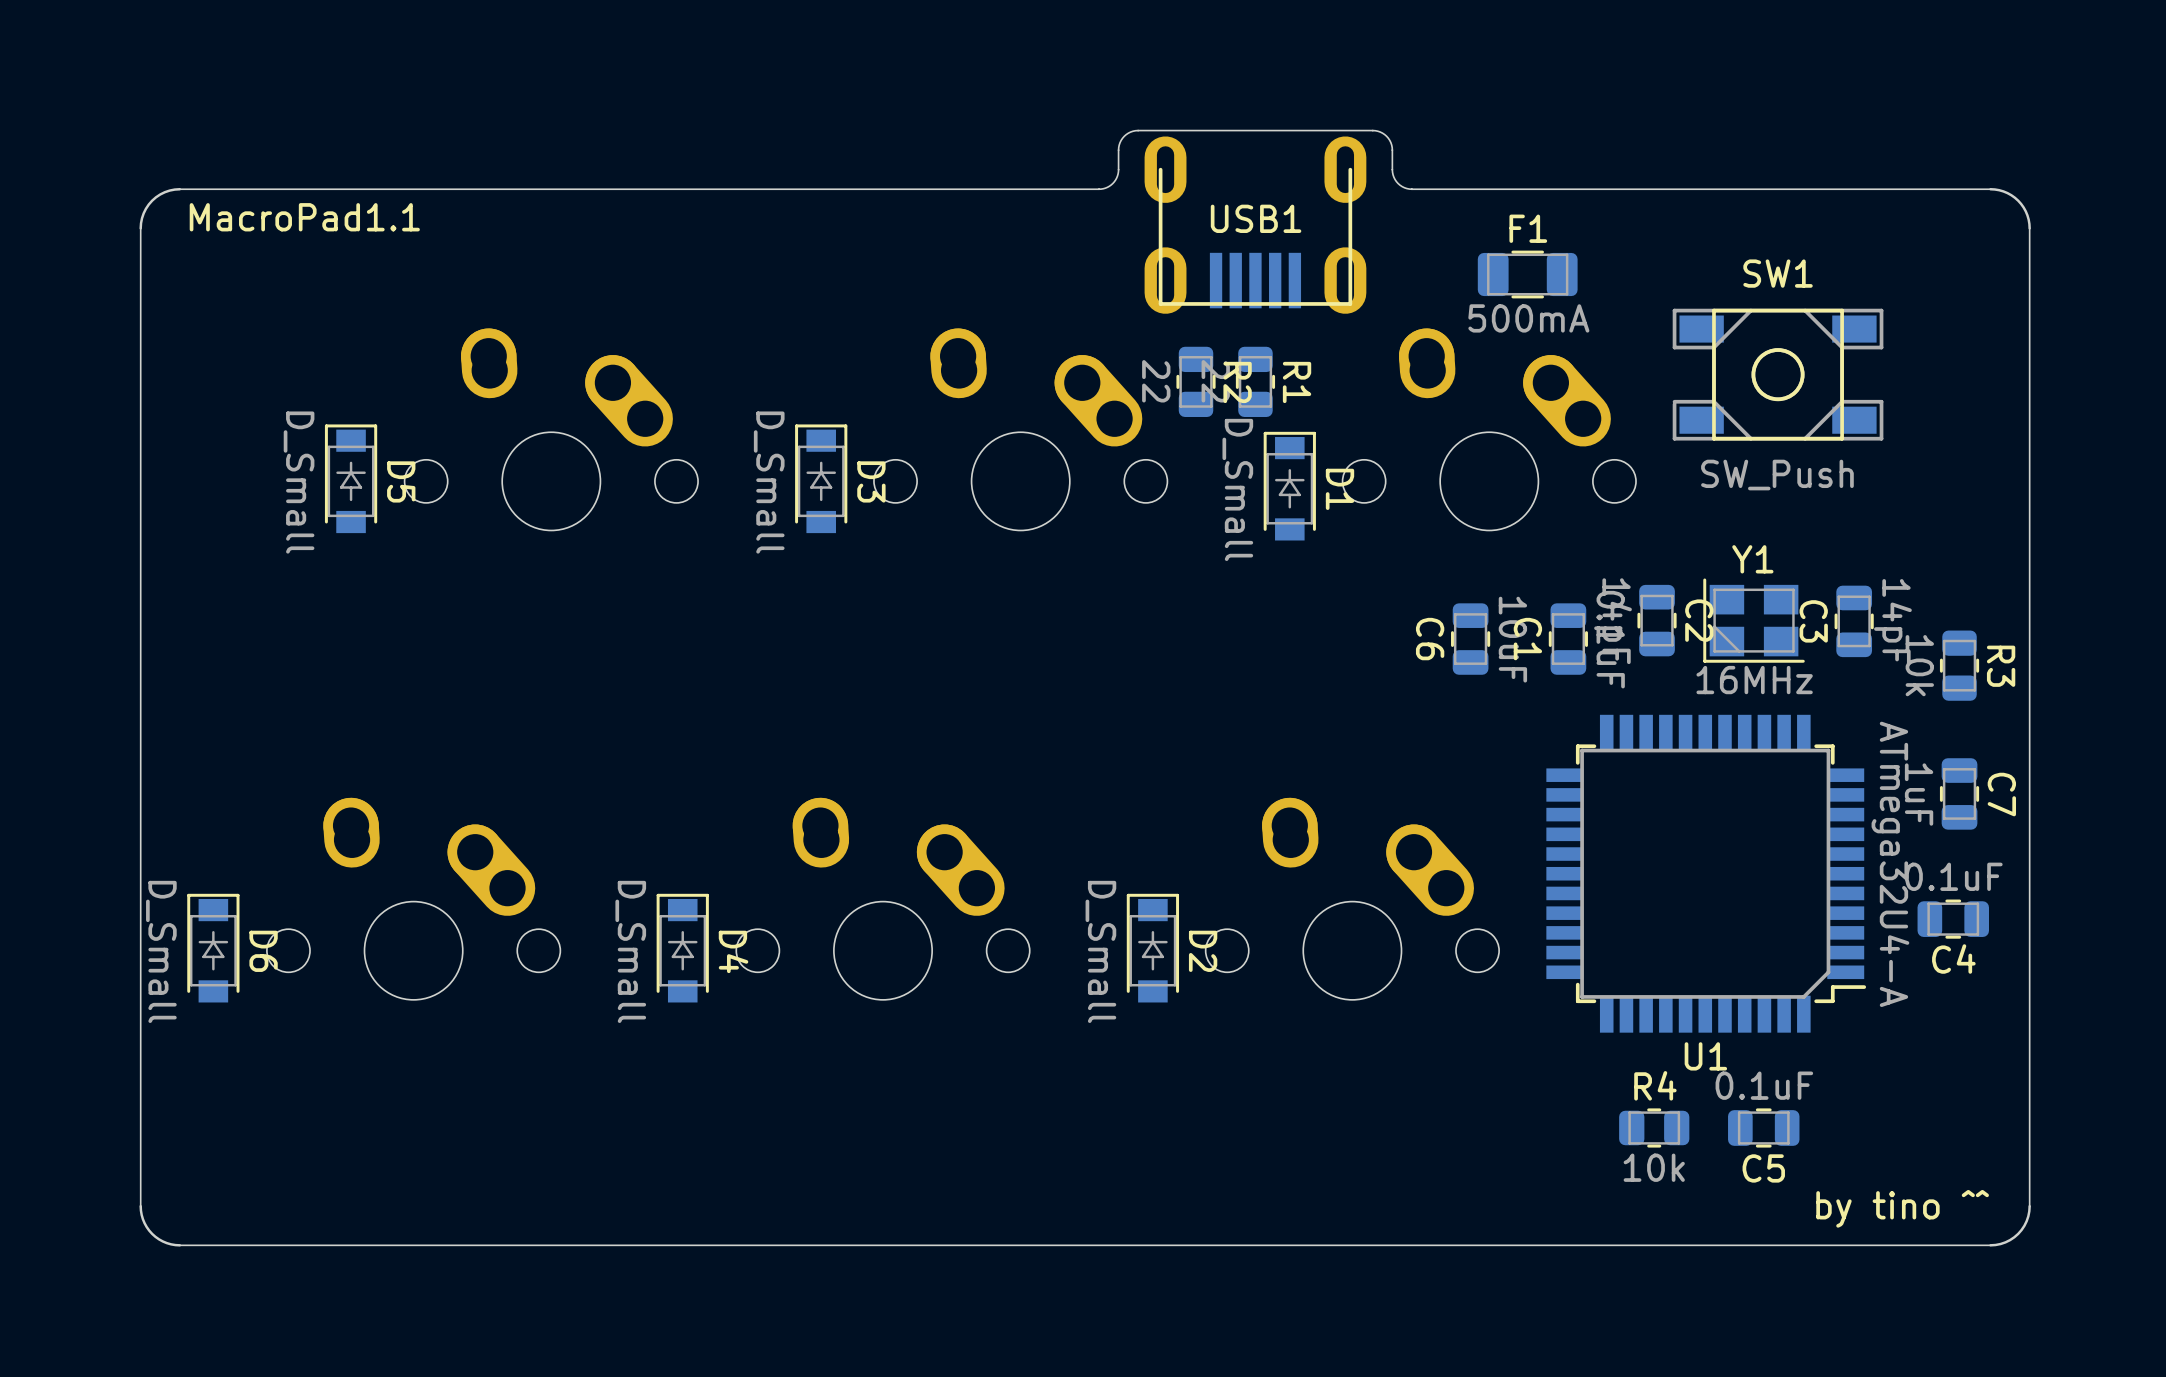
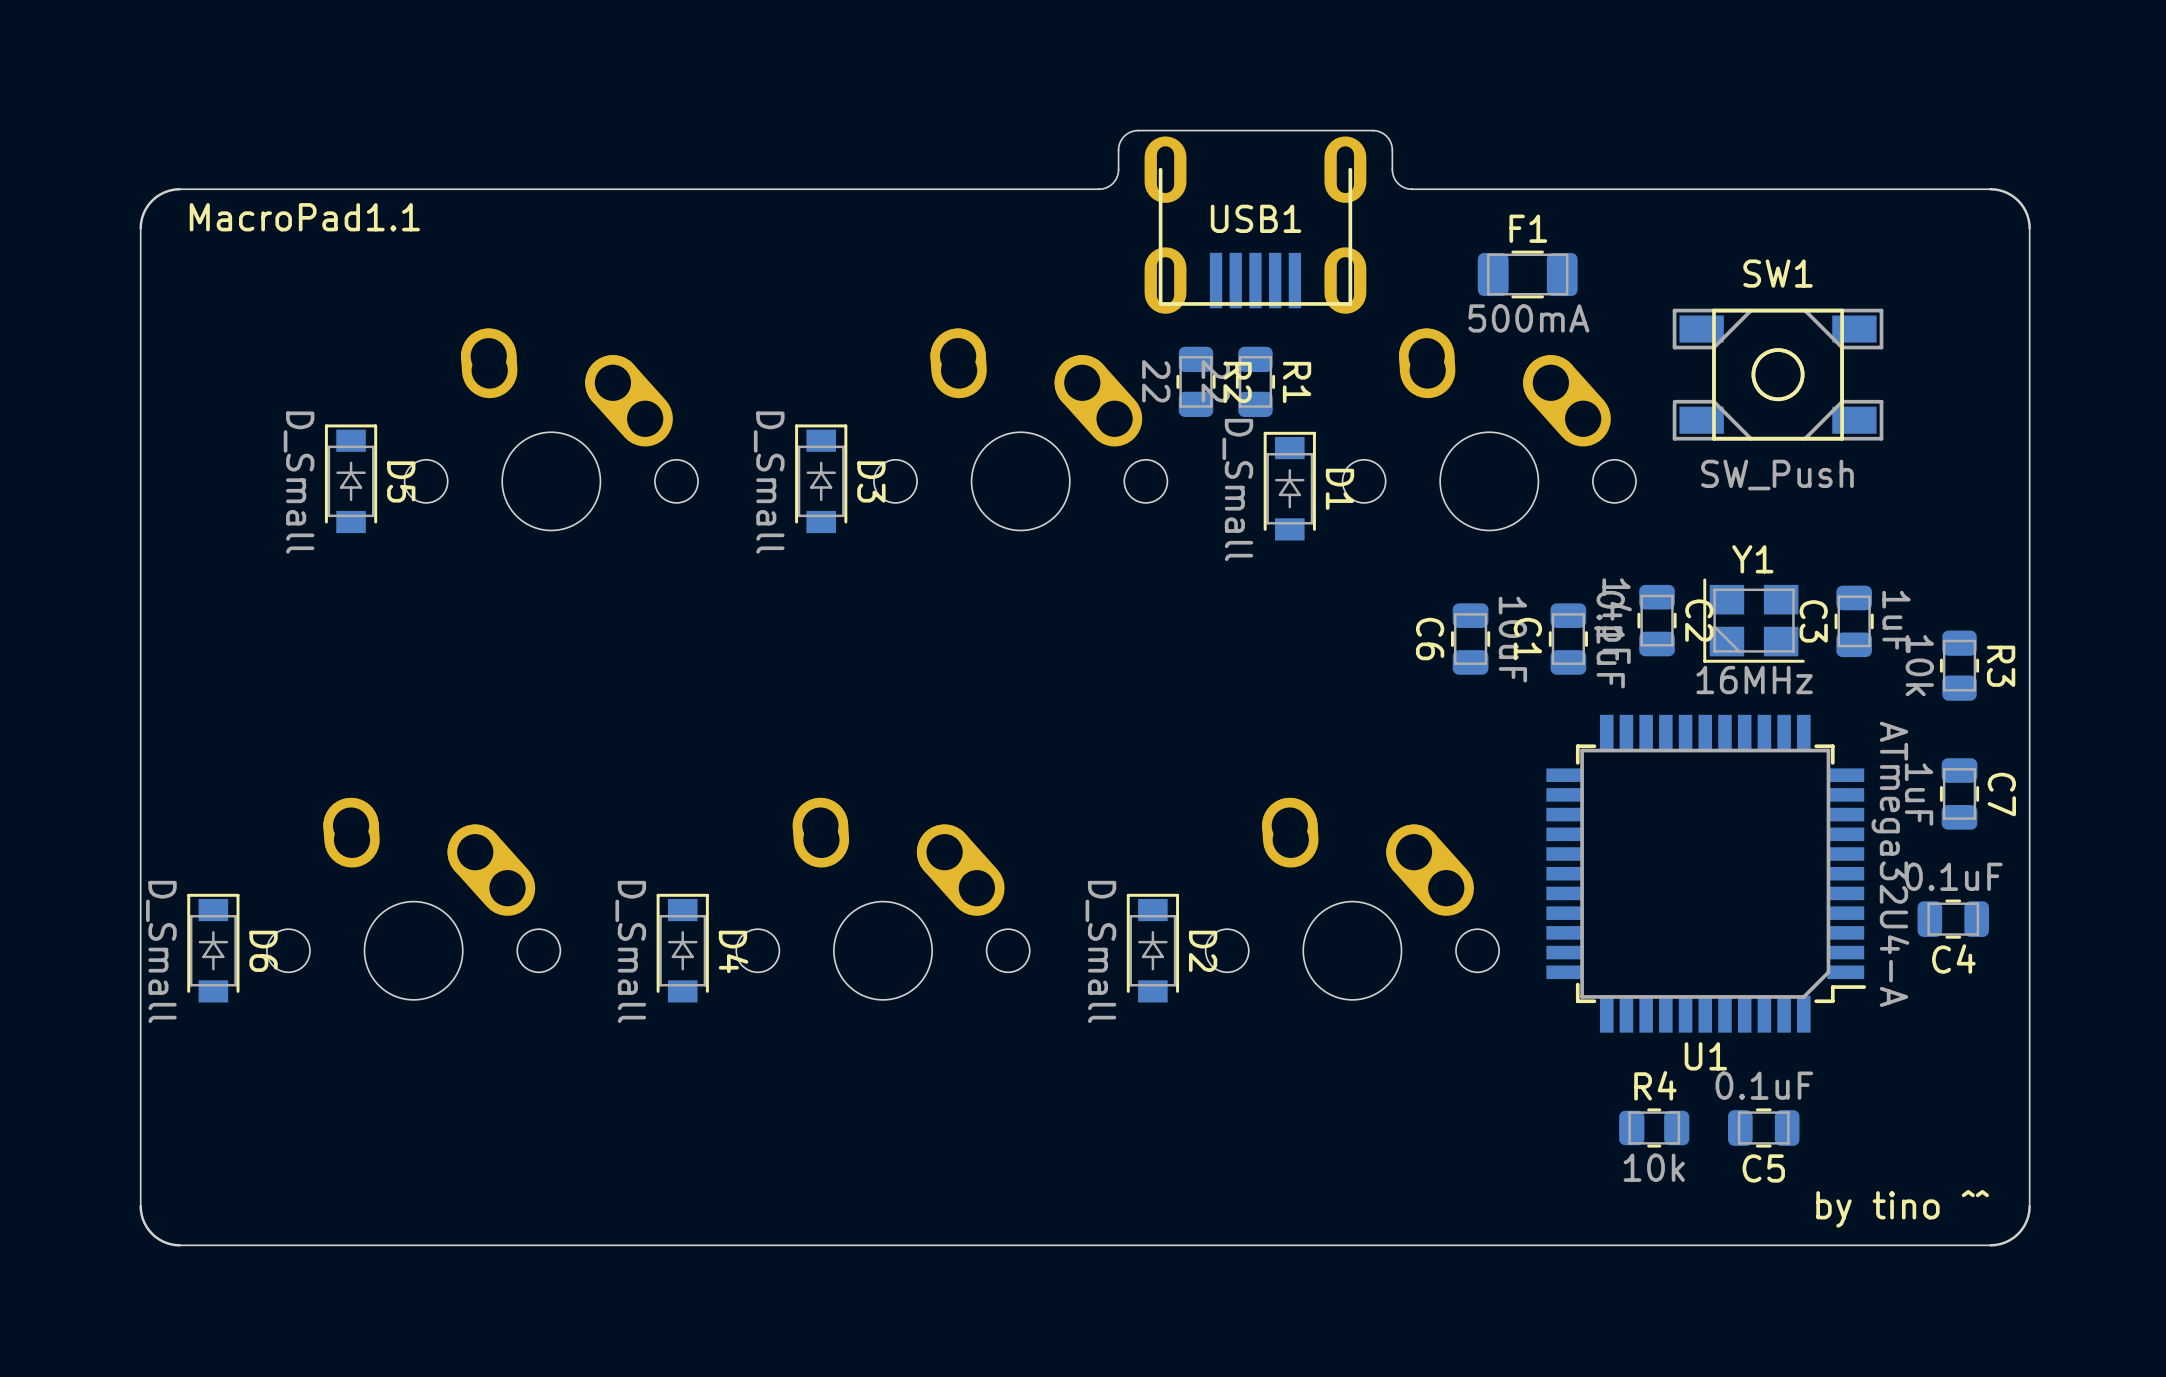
C3 value: 14pF (1892, 621) -> 1uF (1896, 621)

